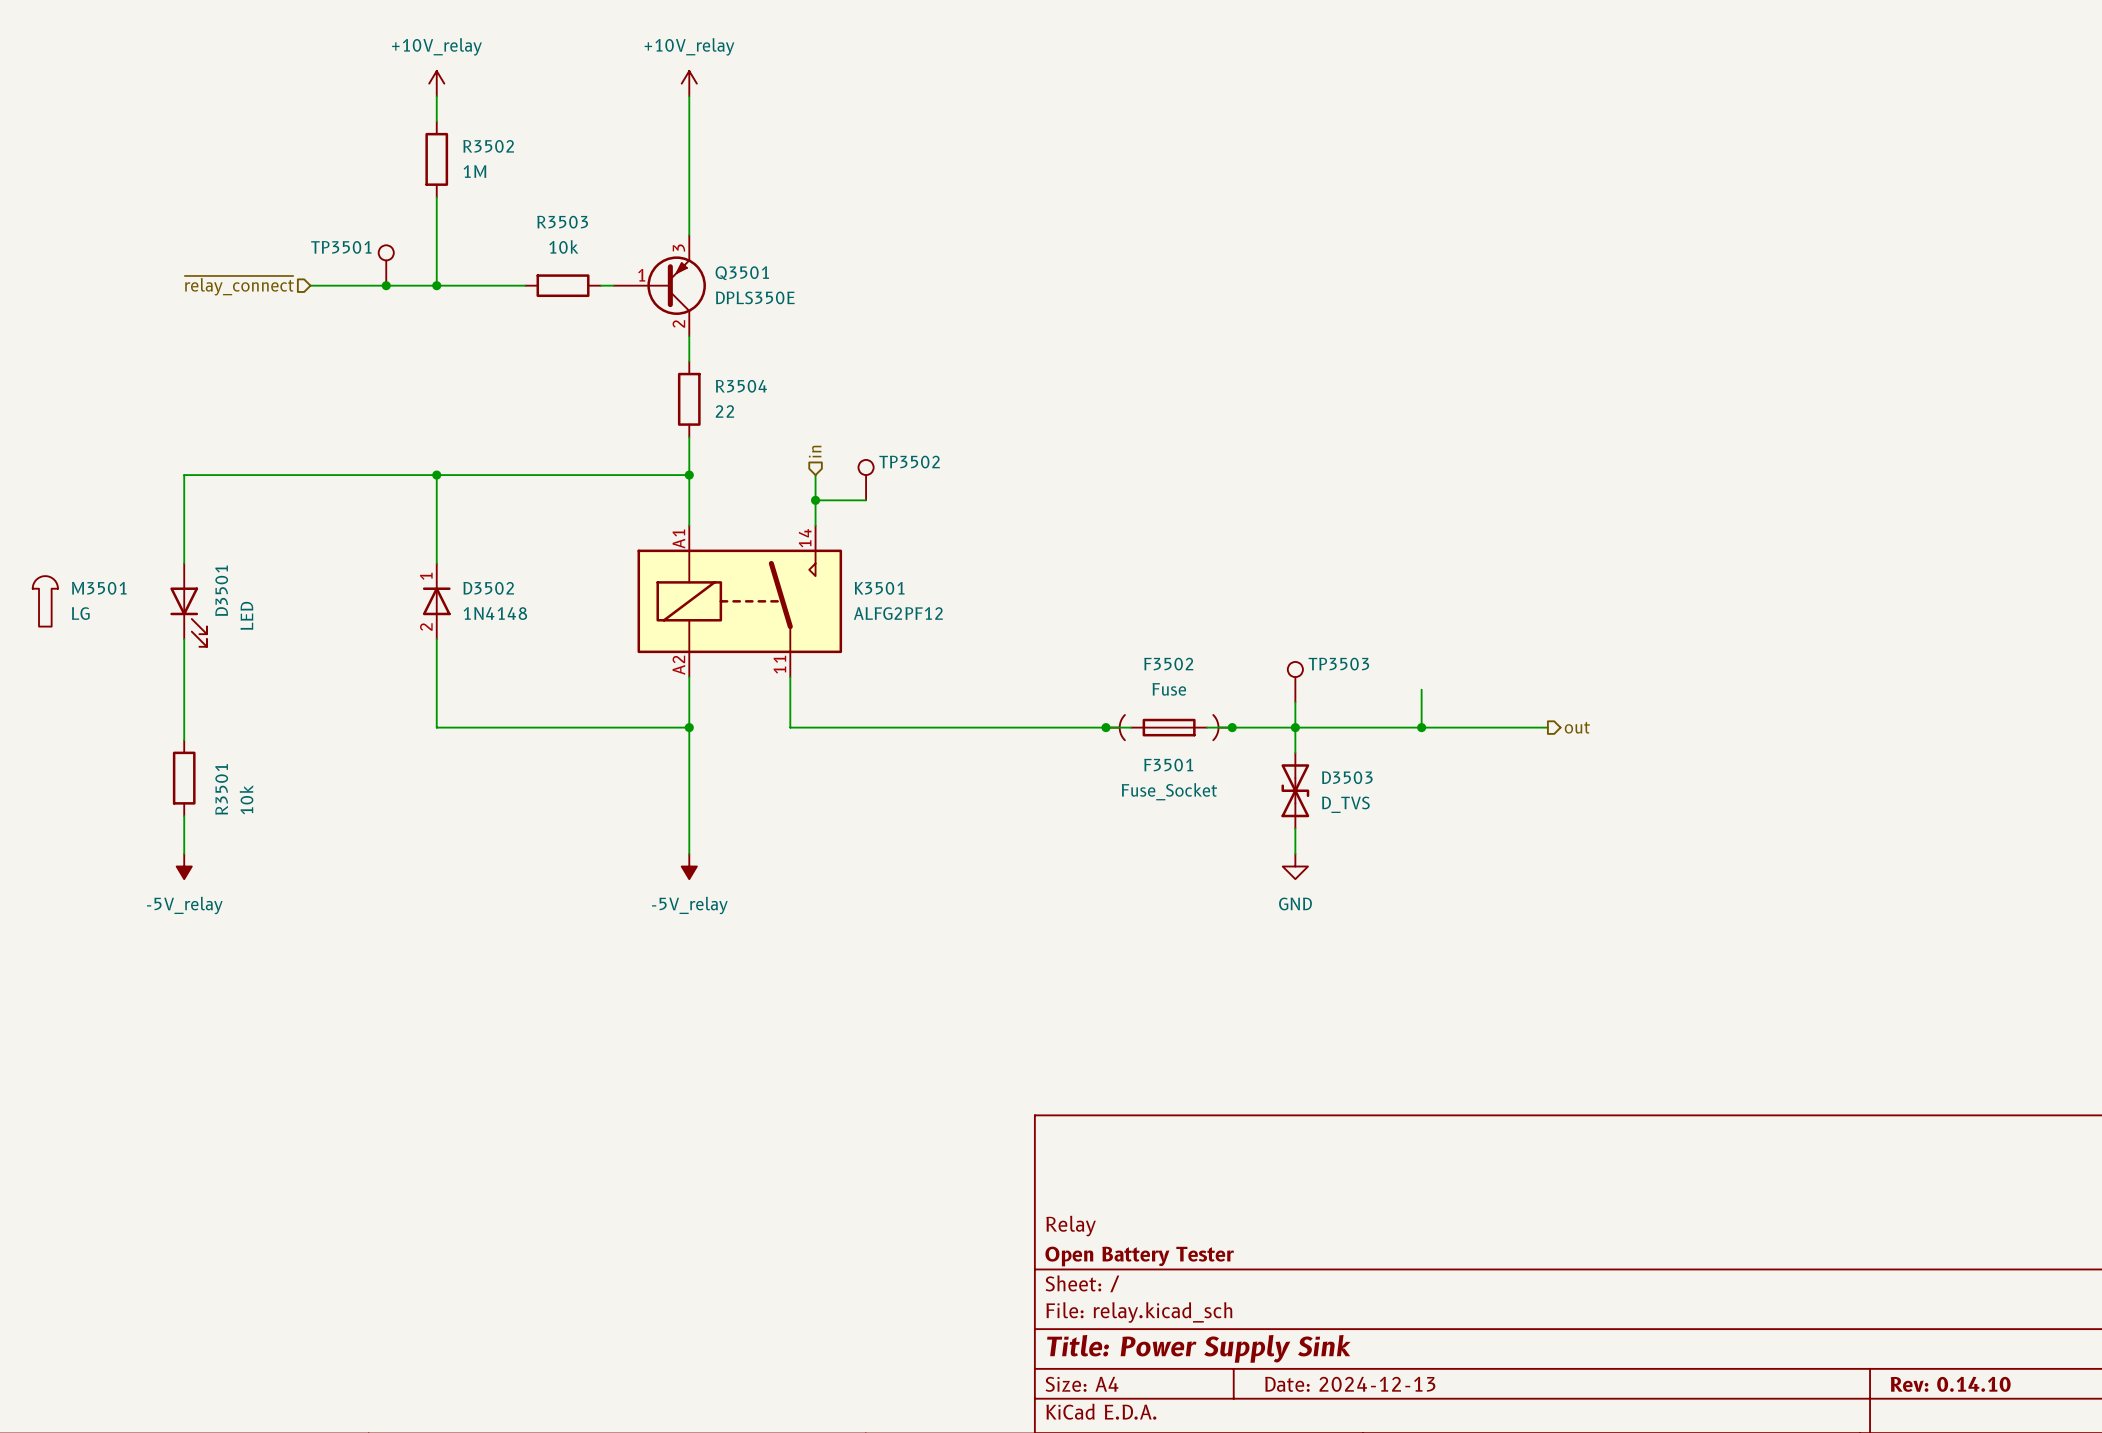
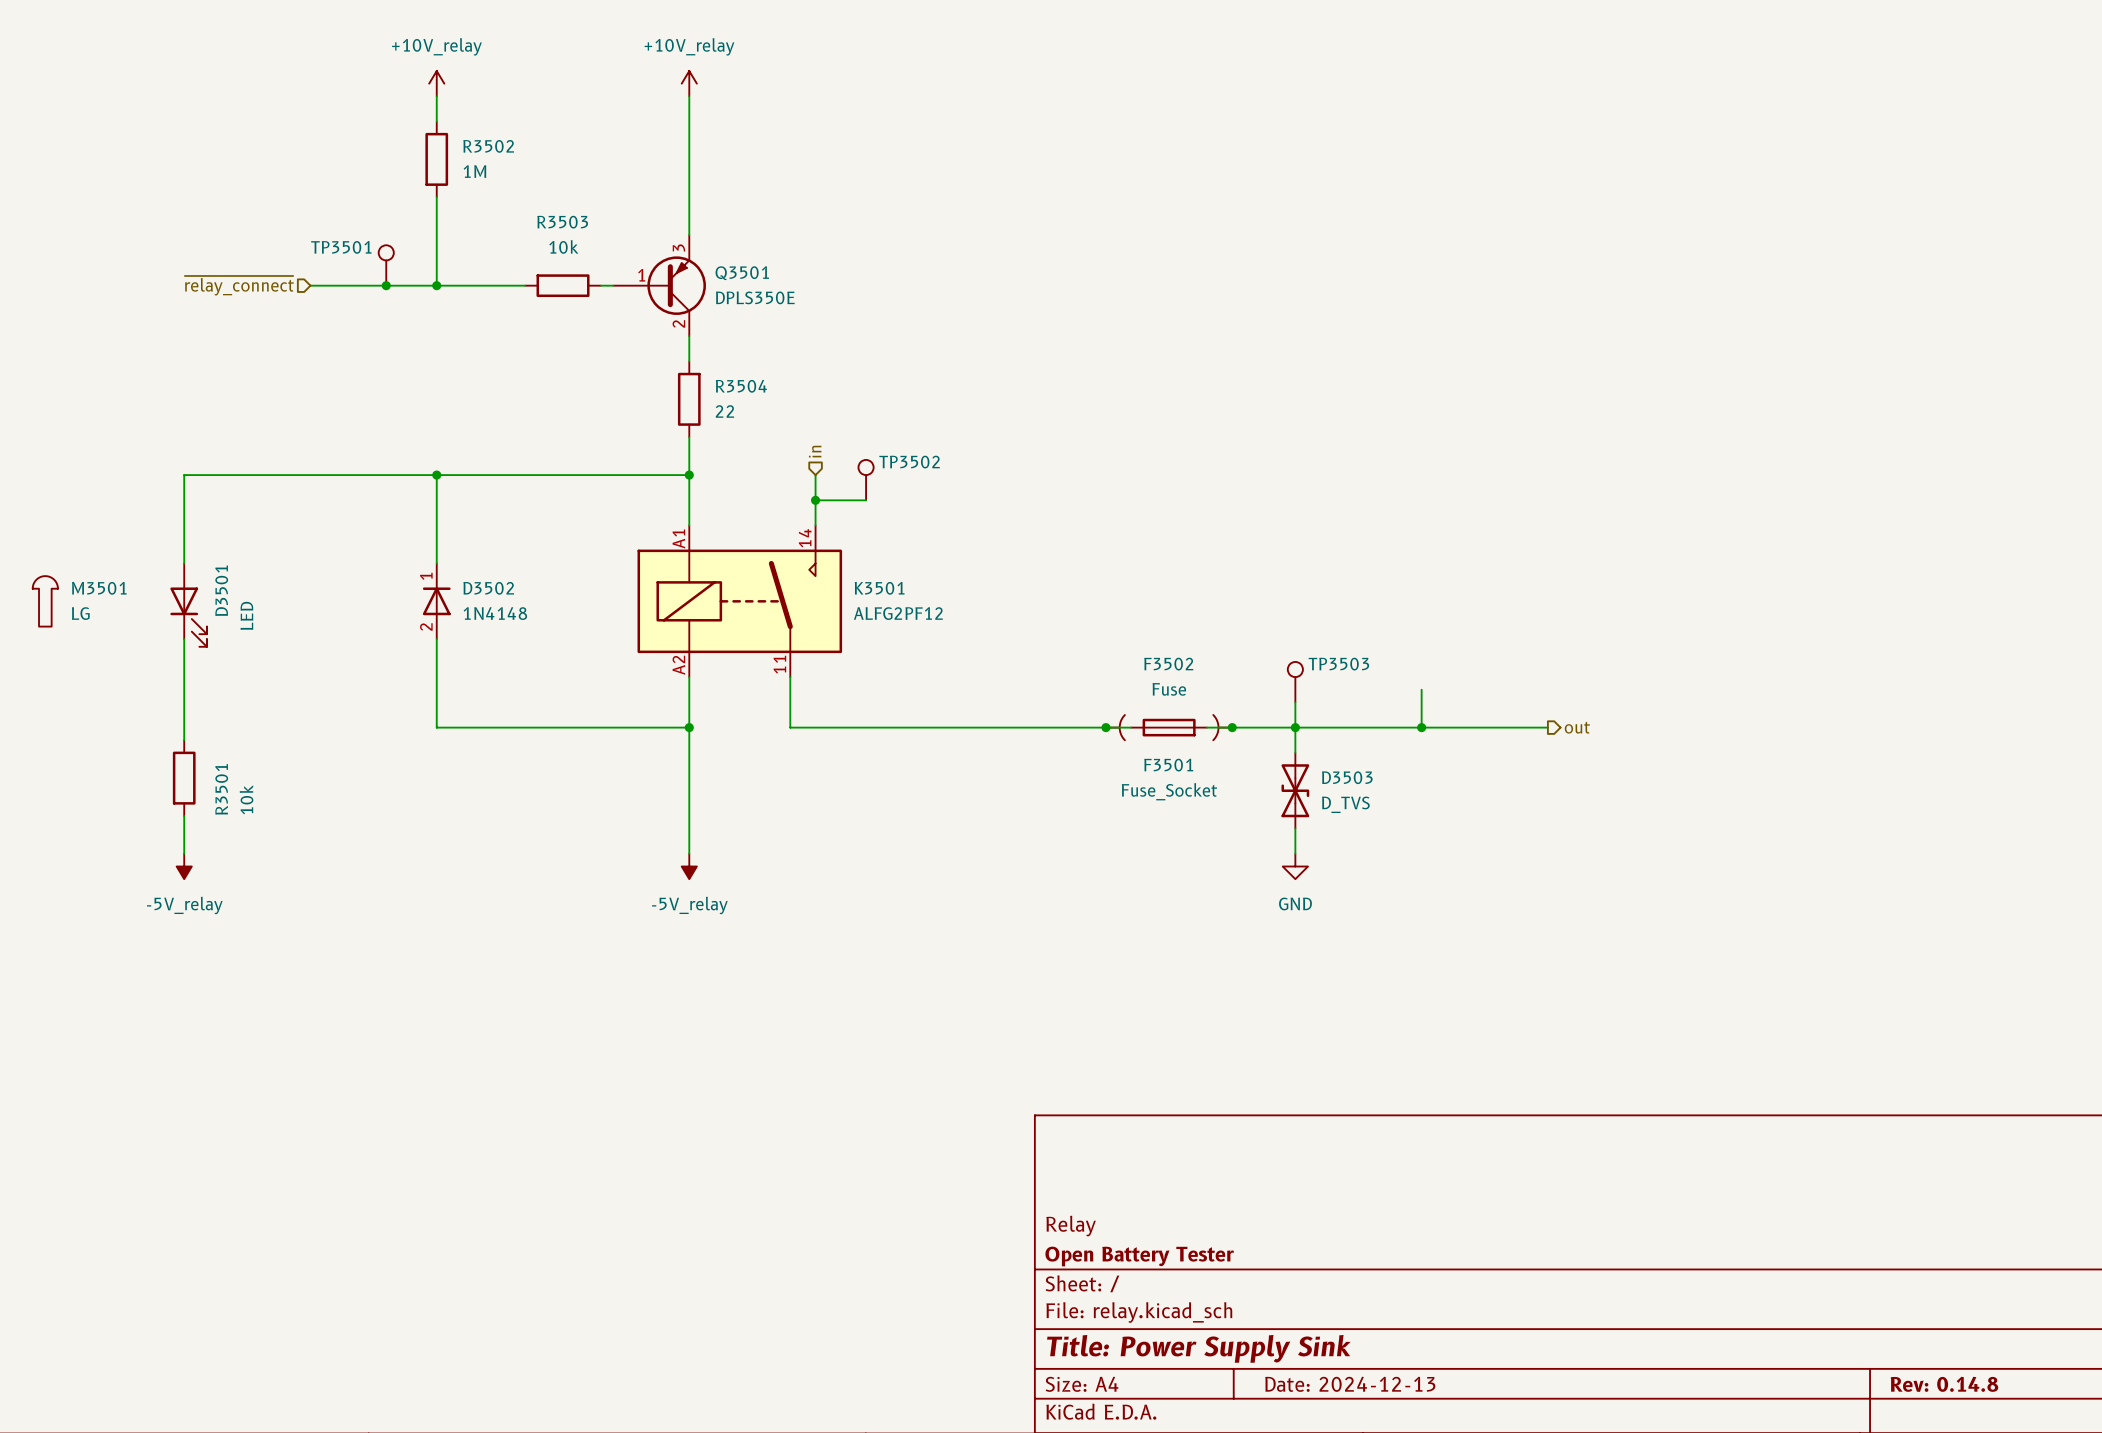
title block: Rev: 0.14.10 (1950, 1384) -> Rev: 0.14.8 (1944, 1384)

